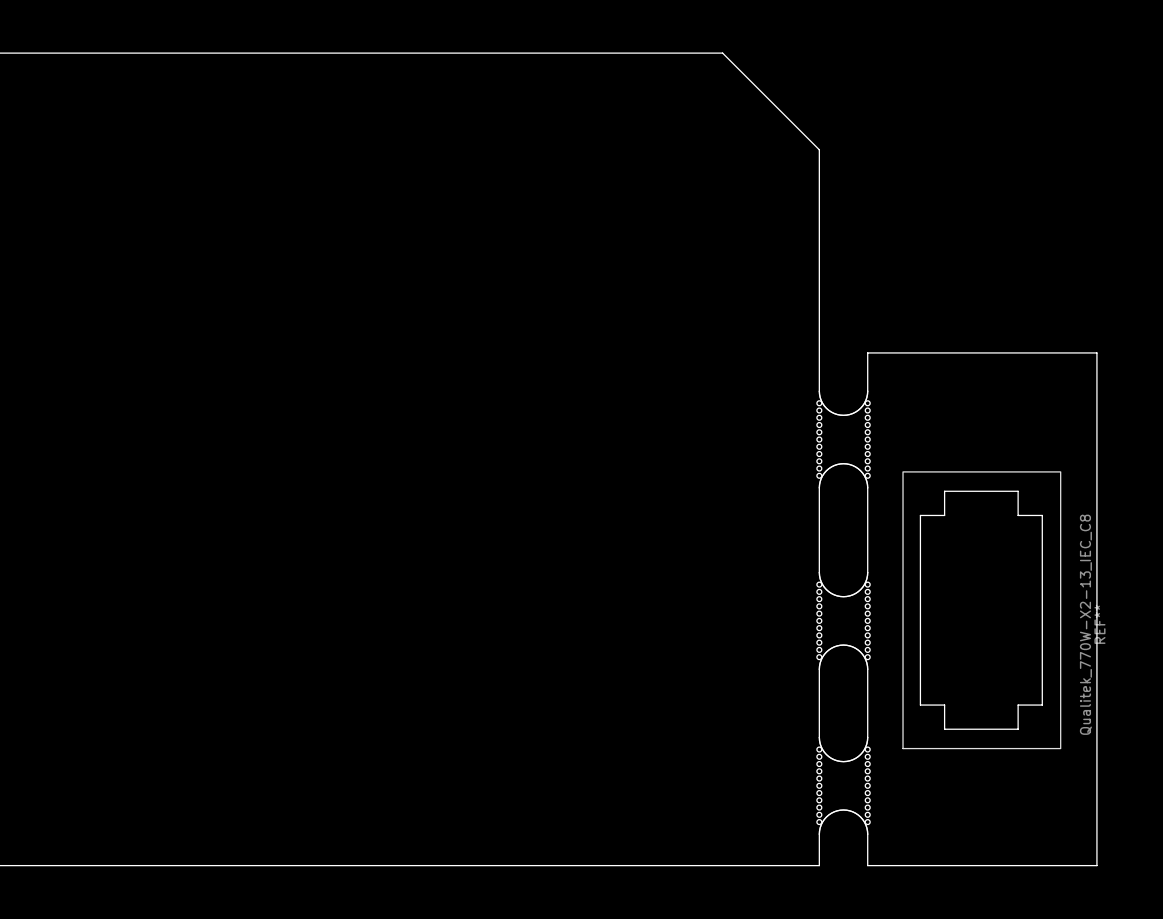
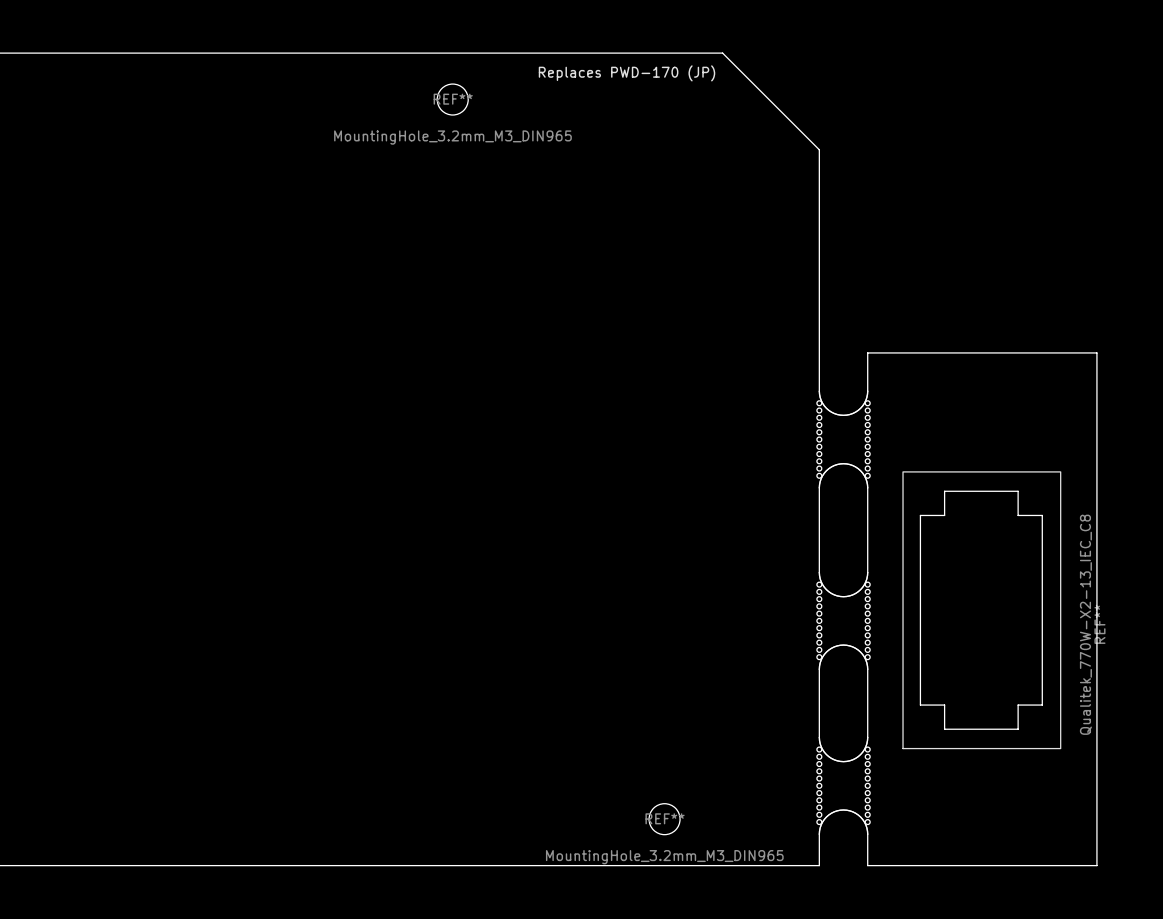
text: none -> Replaces PWD-170 (JP) (627, 73)
REF**: none -> MountingHole_3.2mm_M3_DIN965 (452, 99)
REF**: none -> MountingHole_3.2mm_M3_DIN965 (664, 819)

